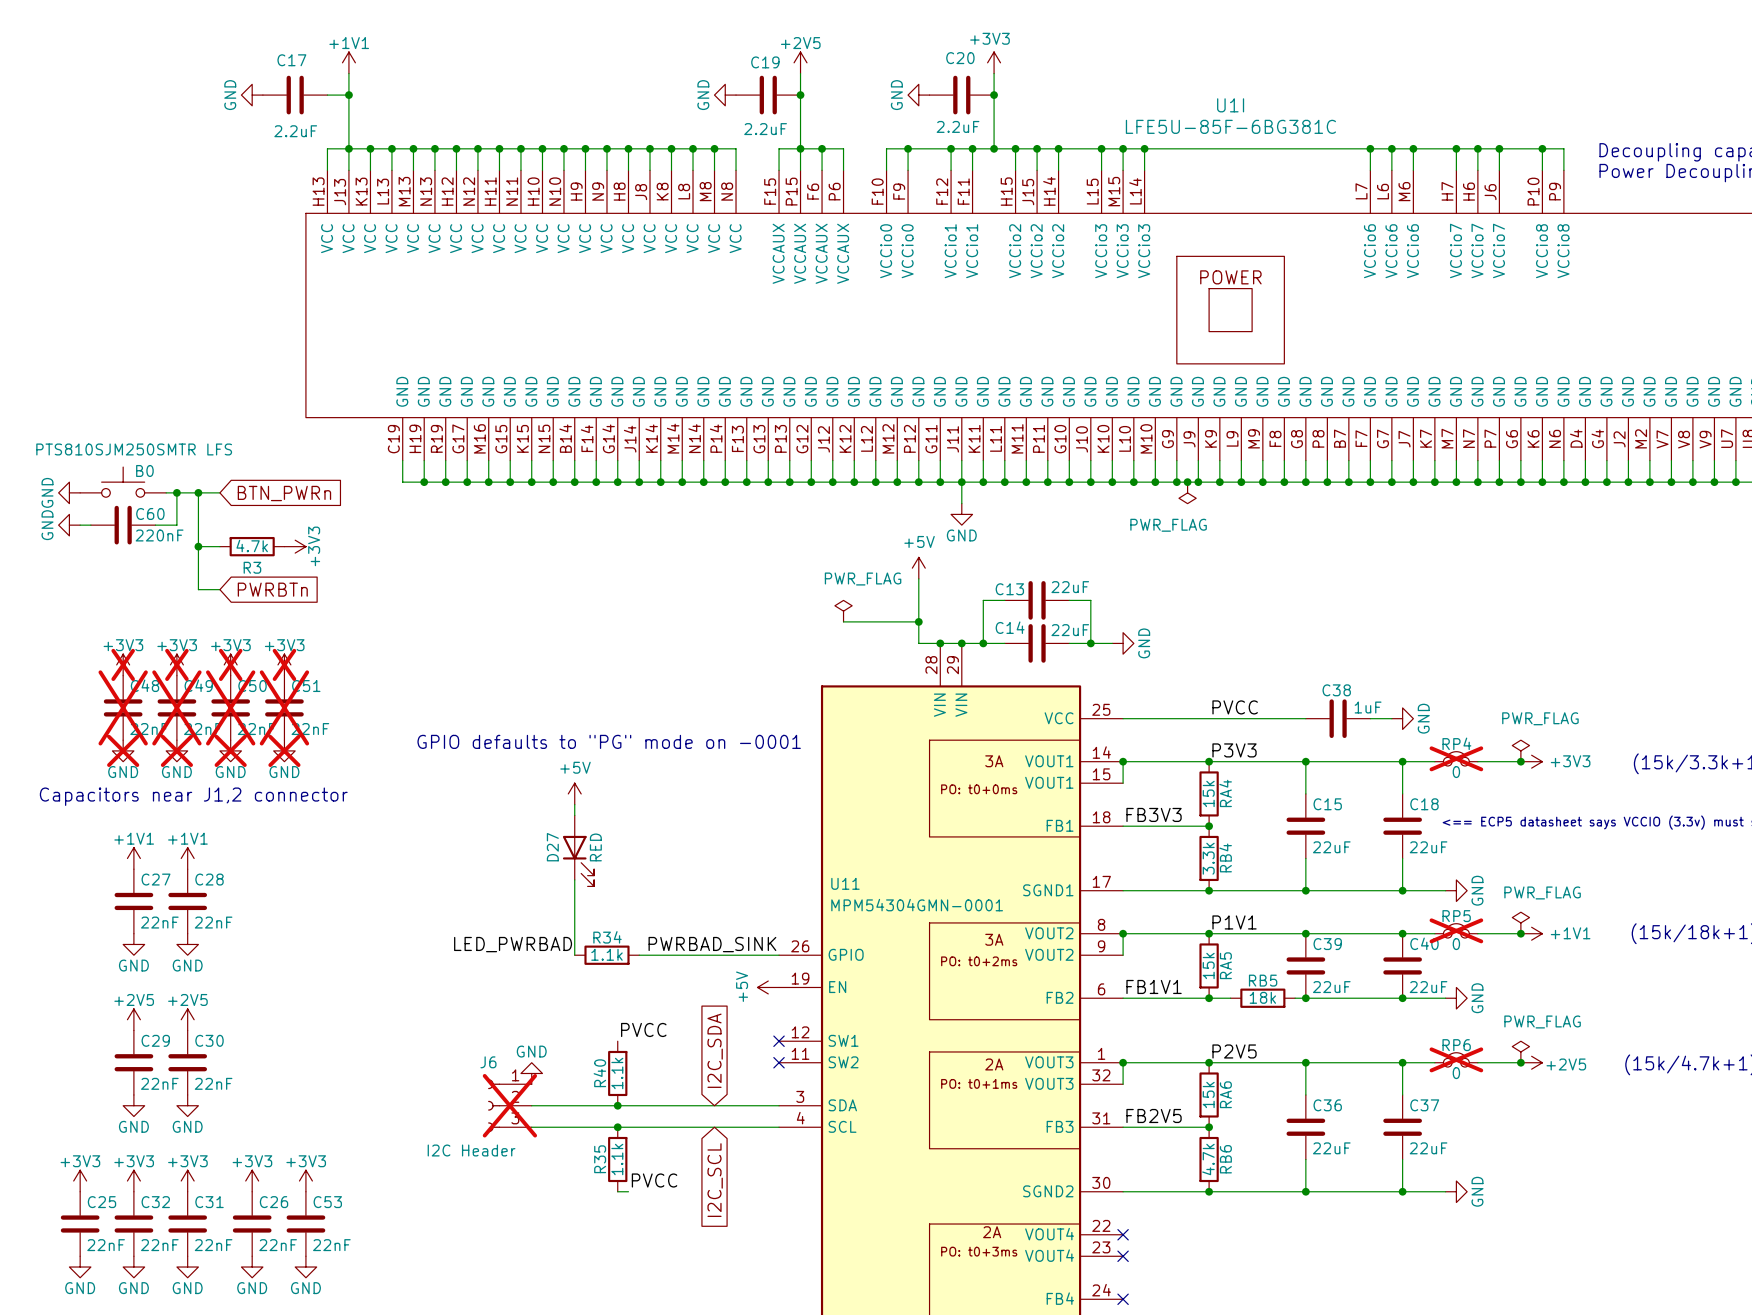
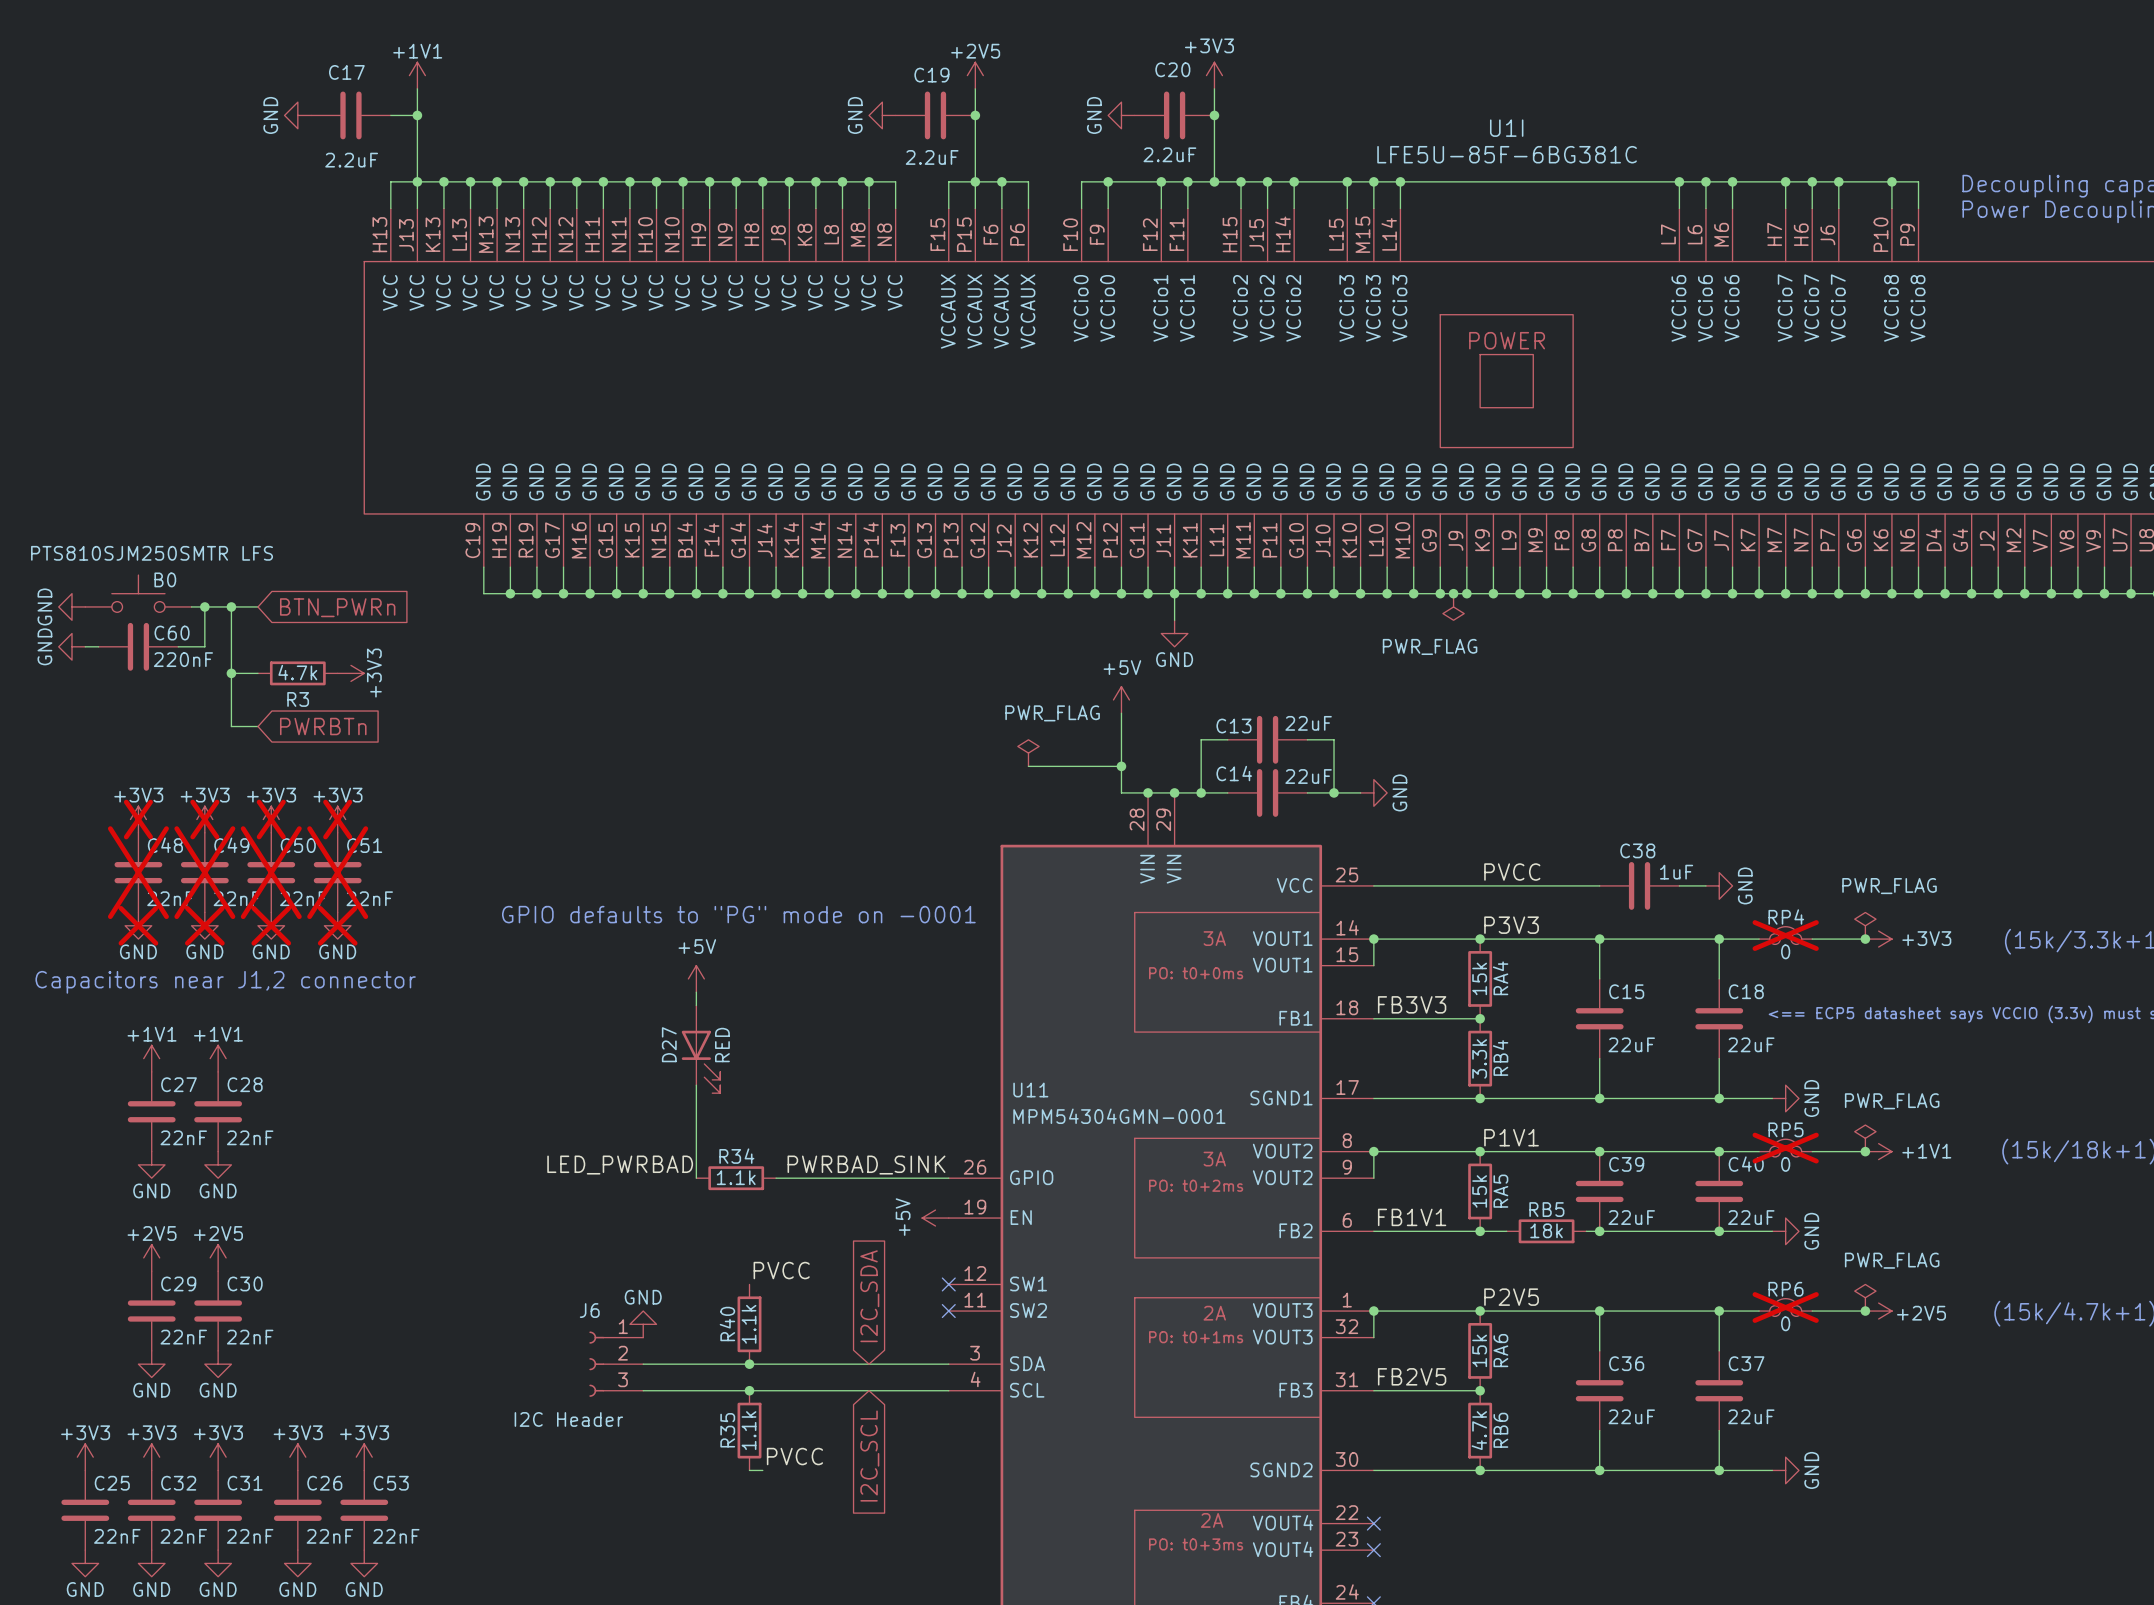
J6 do-not-place cross: (509, 1105) -> none

